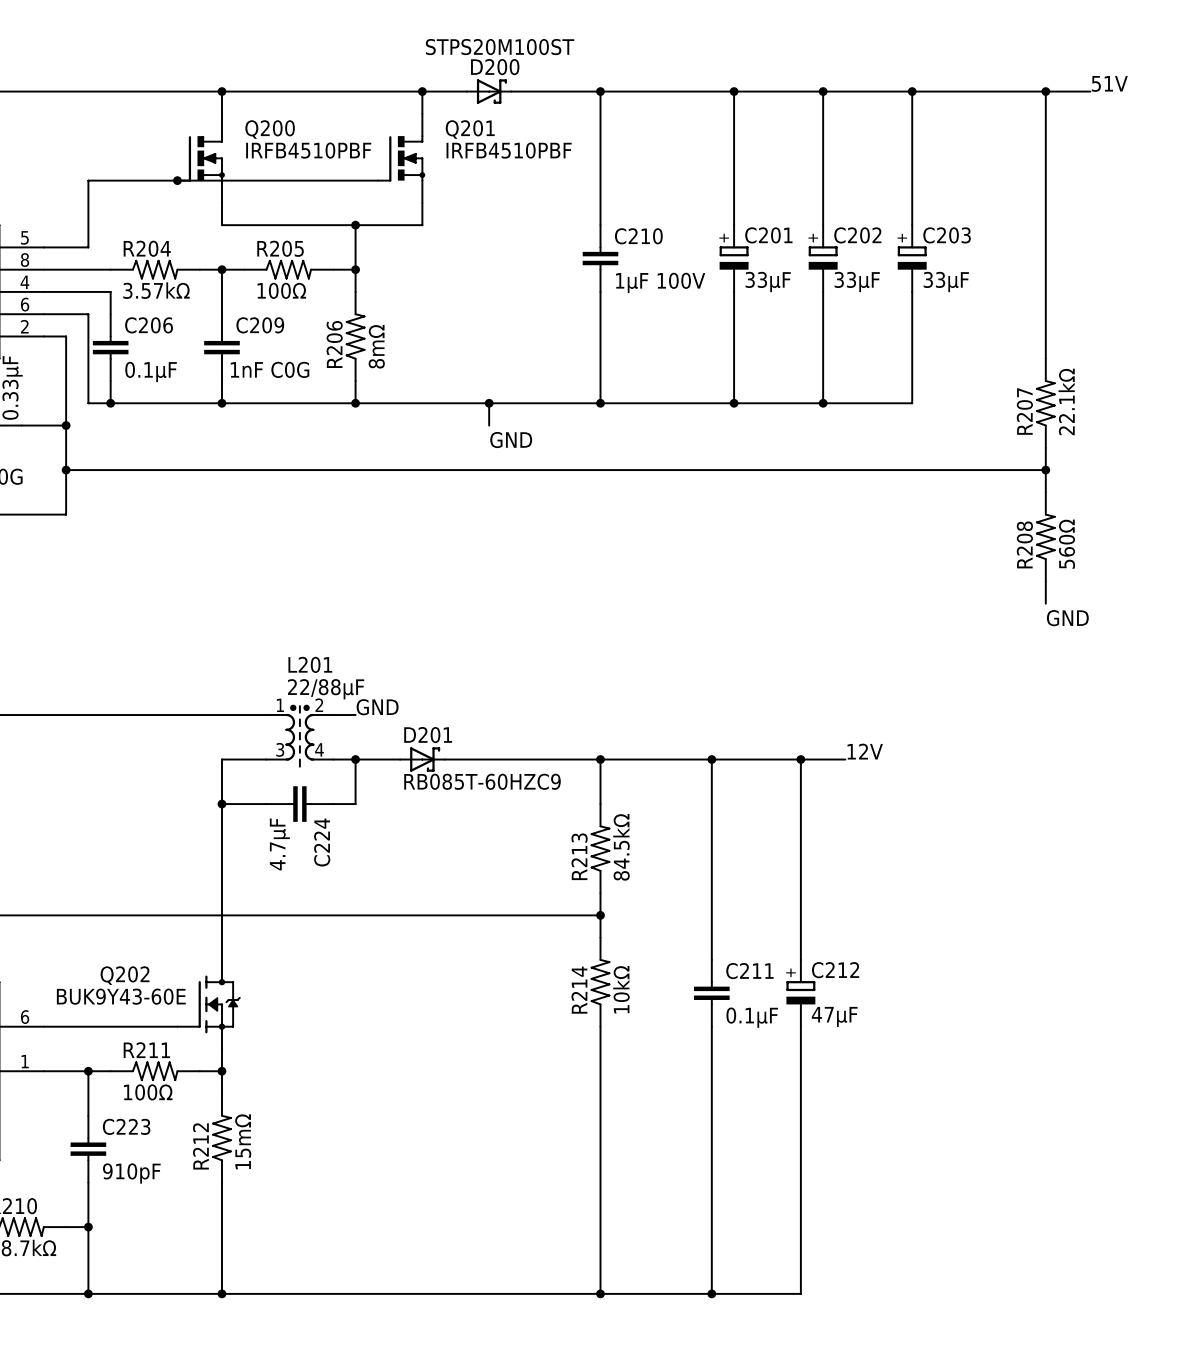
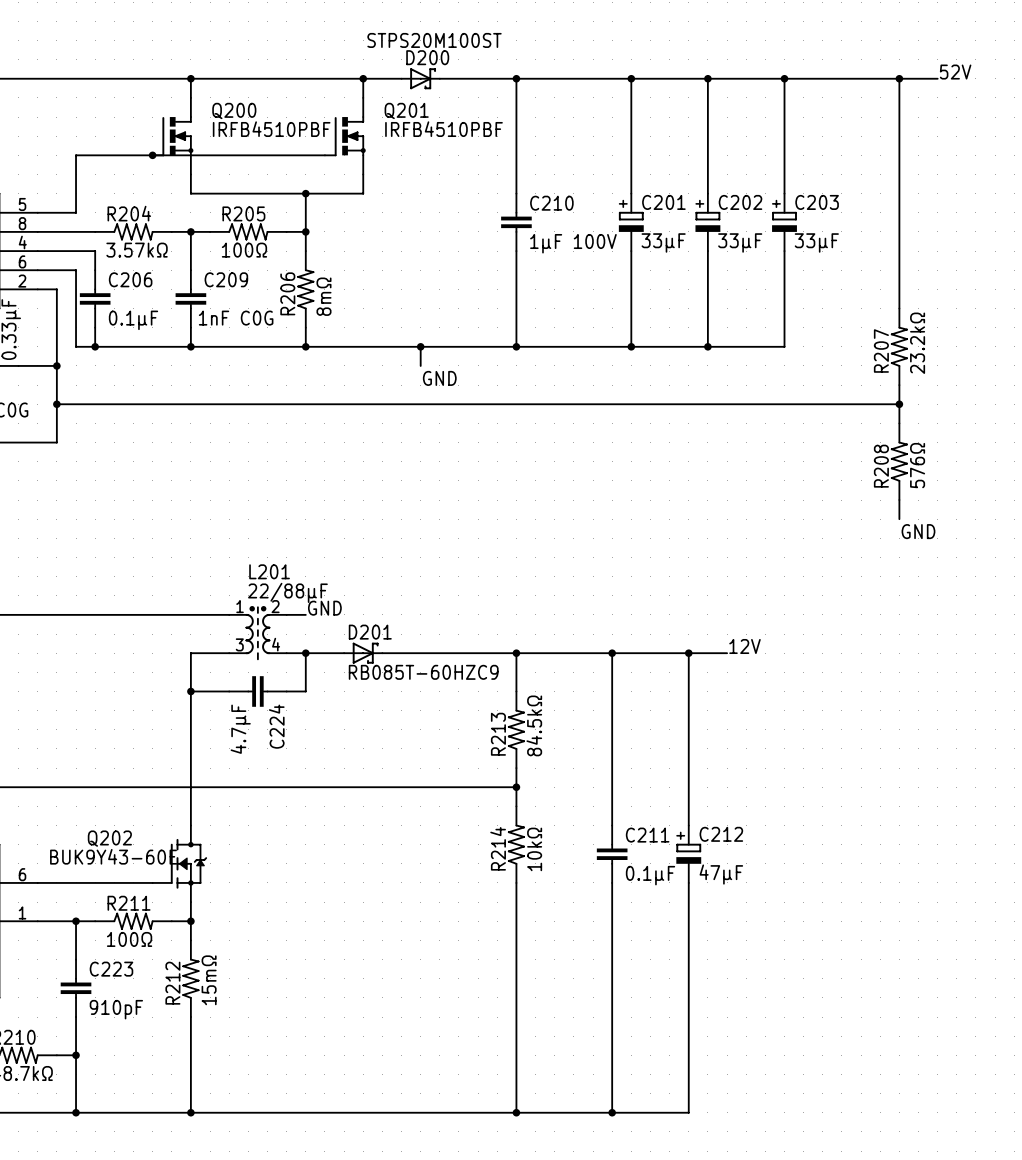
label: 51V (1109, 83) -> 52V (955, 72)
R207 value: 22.1kΩ (1066, 401) -> 23.2kΩ (917, 343)
R208 value: 560Ω (1066, 544) -> 576Ω (917, 465)

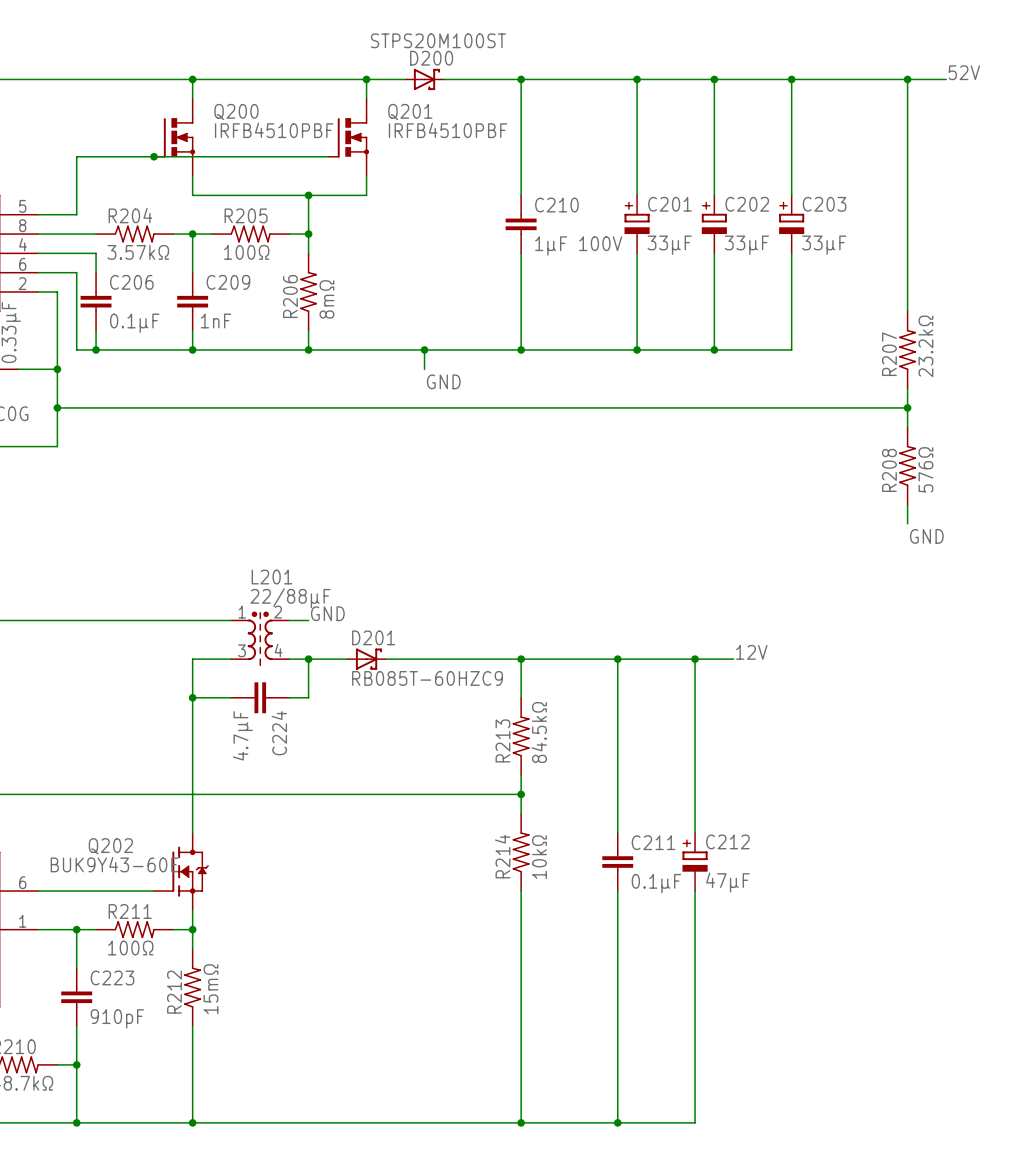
C209 value: 1nF C0G (236, 318) -> 1nF (215, 320)

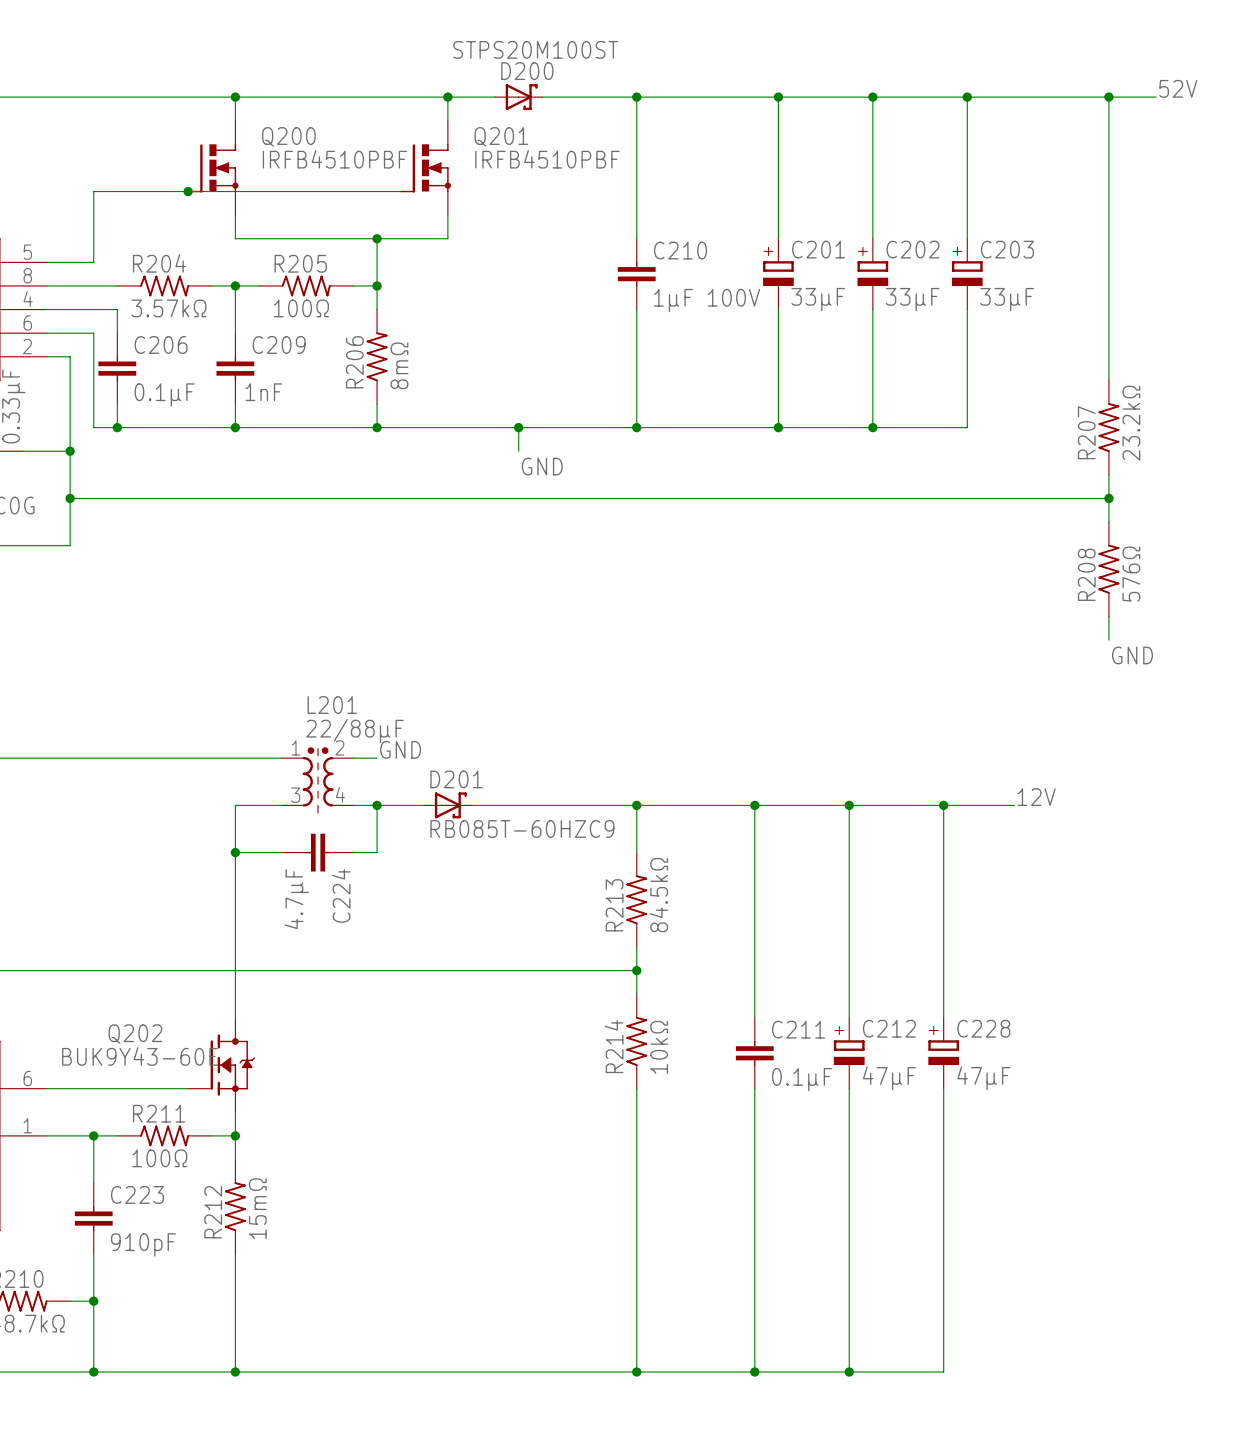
label position: 12V (751, 652) -> 12V (1036, 797)
wire: none -> (896, 805) (1014, 805)
wire: none -> (943, 805) (943, 1017)
junction: none -> (943, 805)
C228: none -> 47µF (943, 1053)
wire: none -> (943, 1088) (943, 1372) (849, 1372)
junction: none -> (849, 1372)

